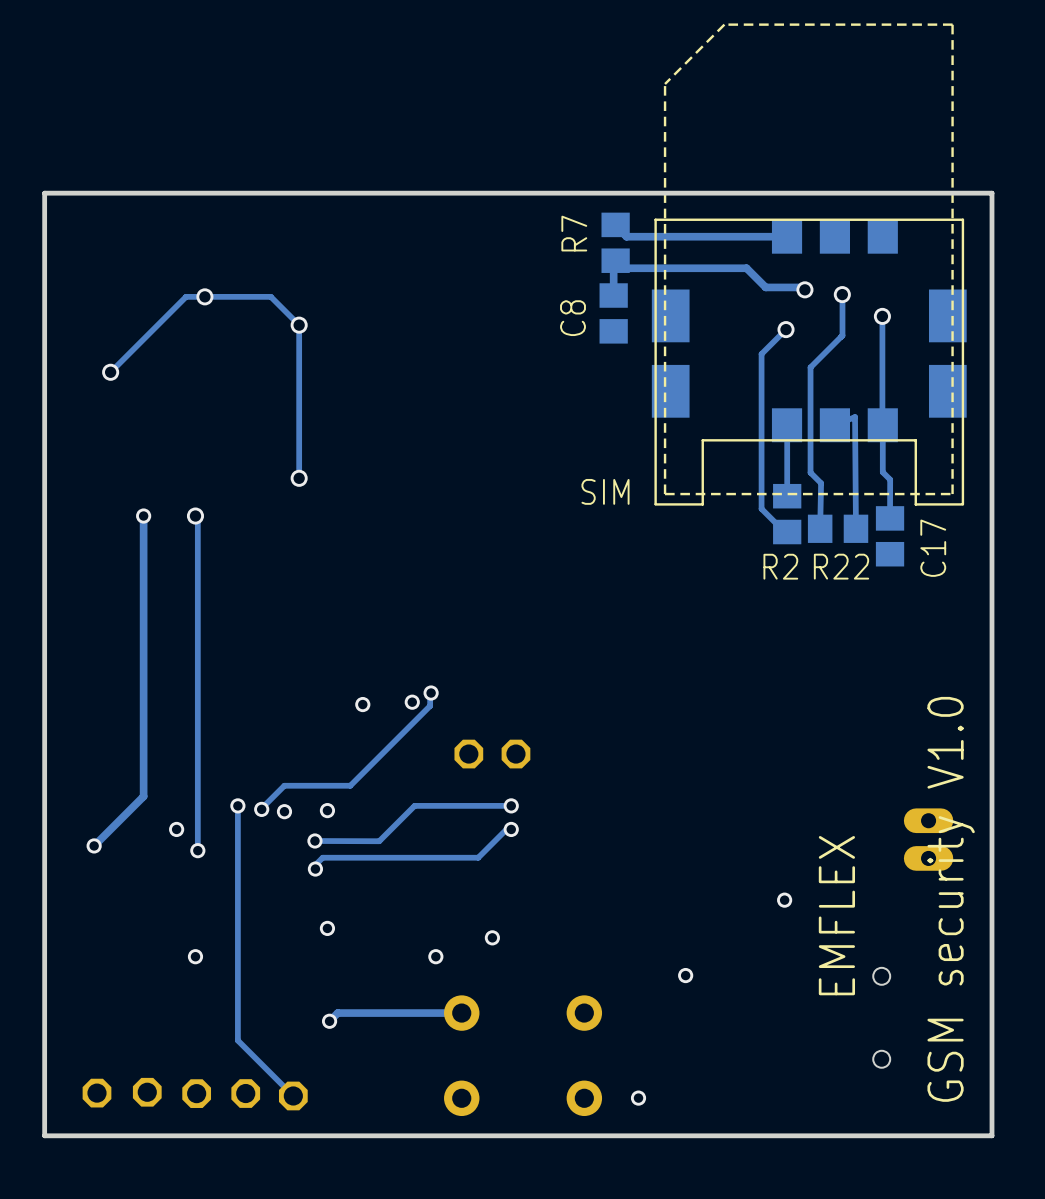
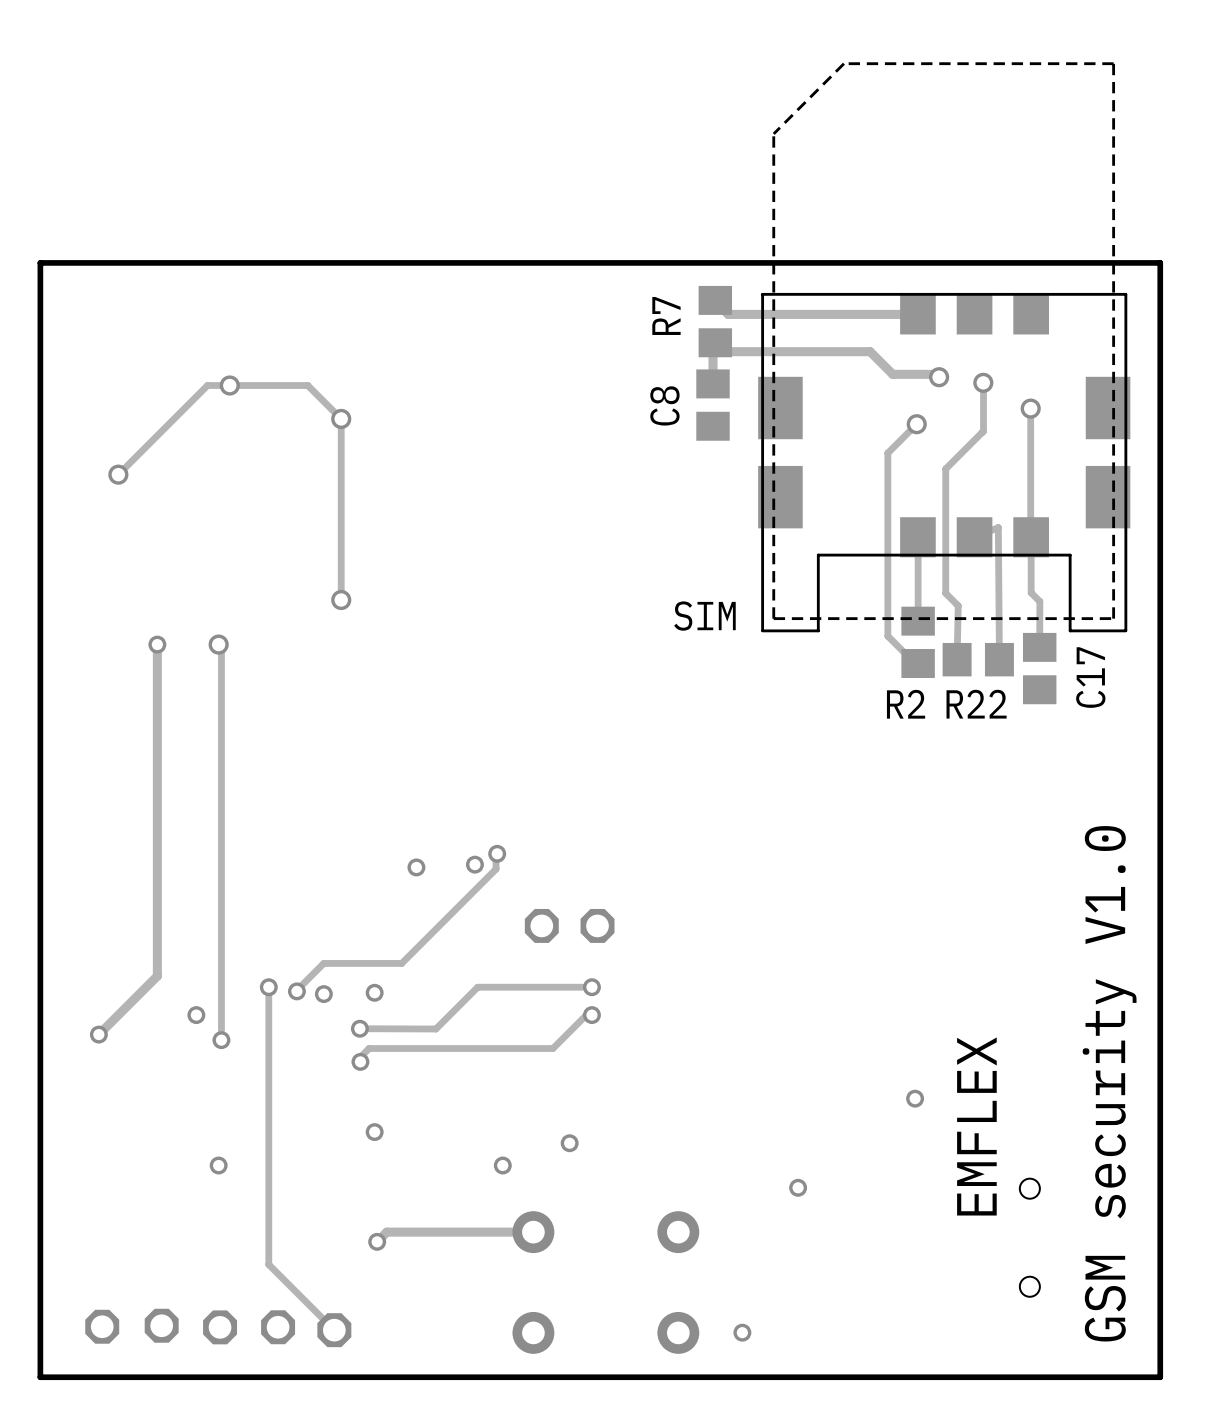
part: (928, 839) -> none

